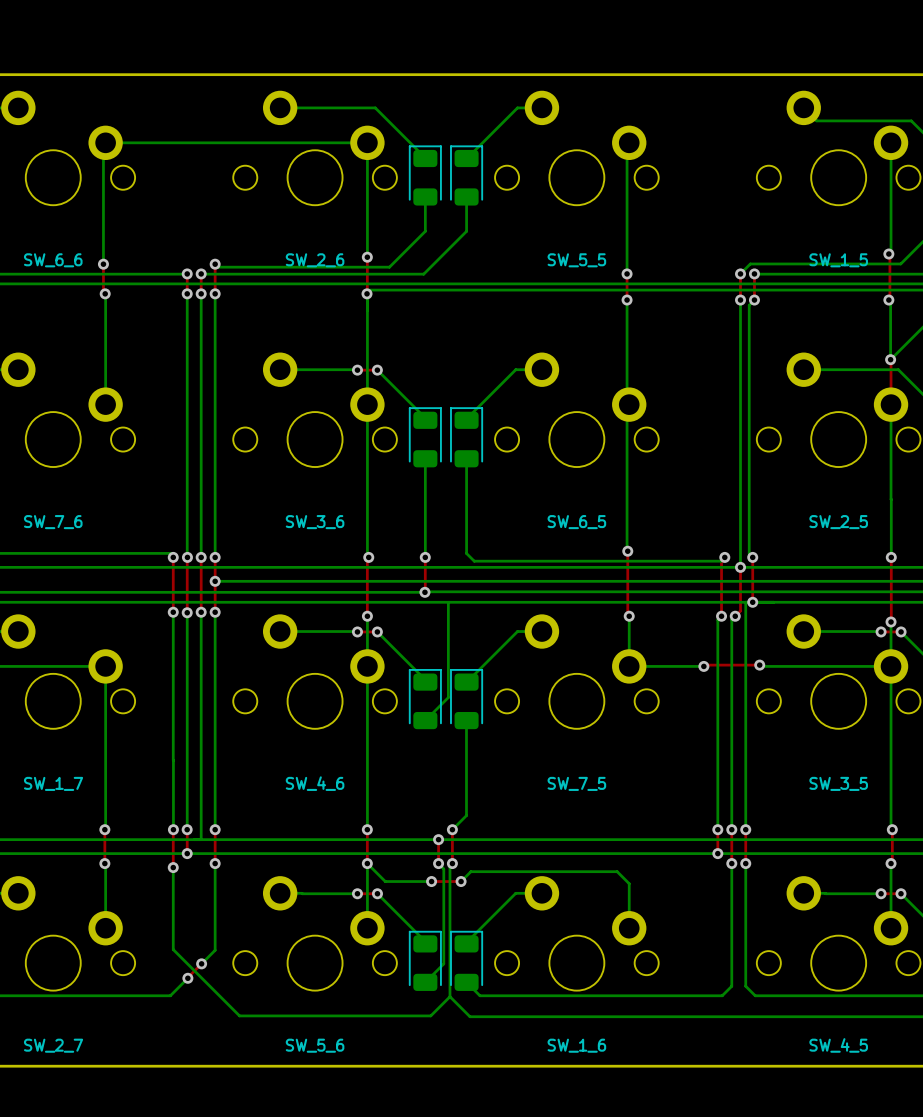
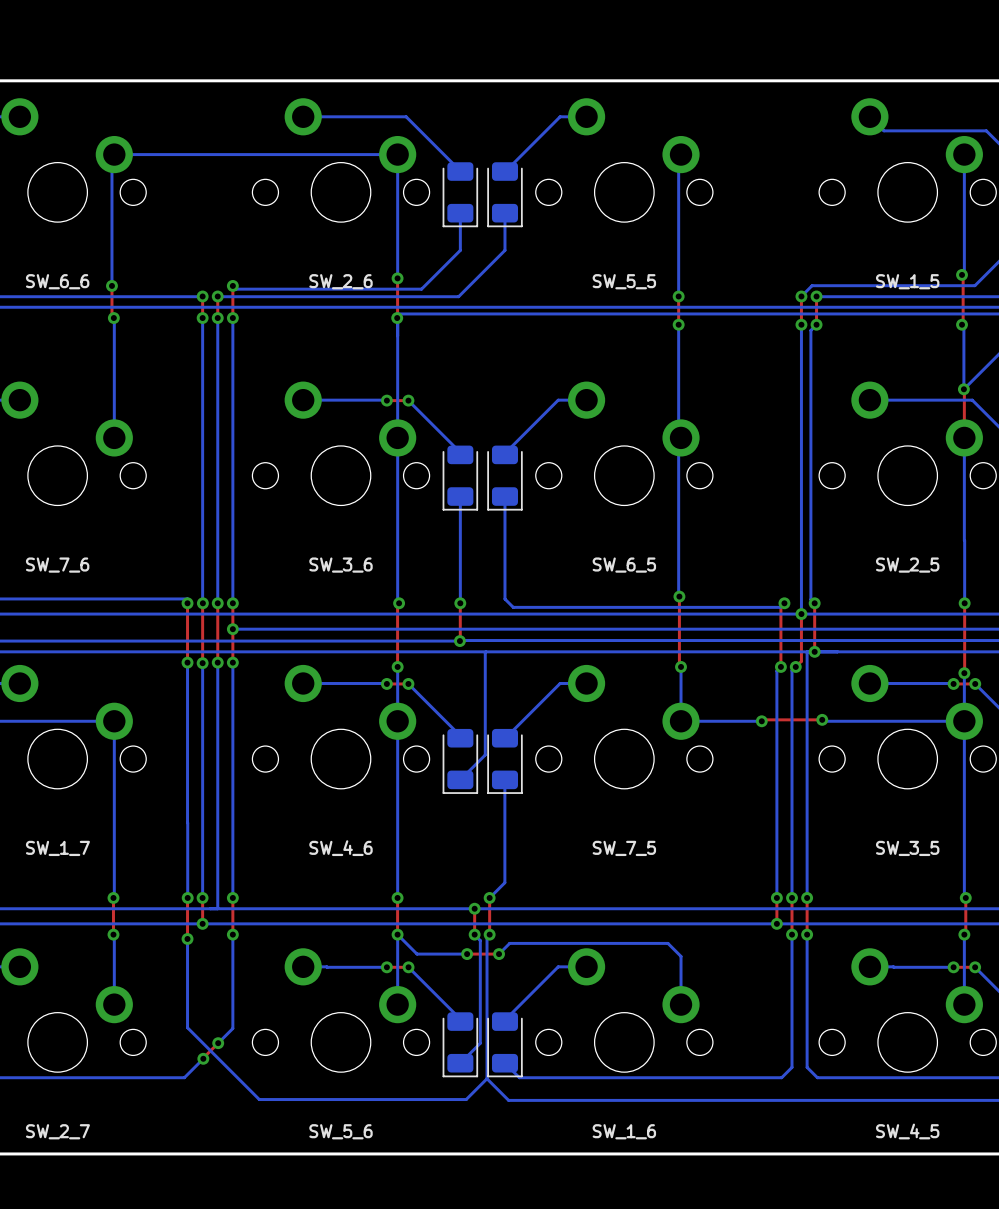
part rotation: 0° (425, 175) -> 180° (460, 194)
part rotation: 0° (466, 175) -> 180° (504, 194)
part rotation: 0° (425, 437) -> 180° (460, 478)
part rotation: 0° (466, 437) -> 180° (504, 478)
part rotation: 0° (425, 699) -> 180° (460, 761)
part rotation: 0° (466, 699) -> 180° (504, 761)
part rotation: 0° (425, 960) -> 180° (460, 1044)
part rotation: 0° (466, 960) -> 180° (504, 1044)

